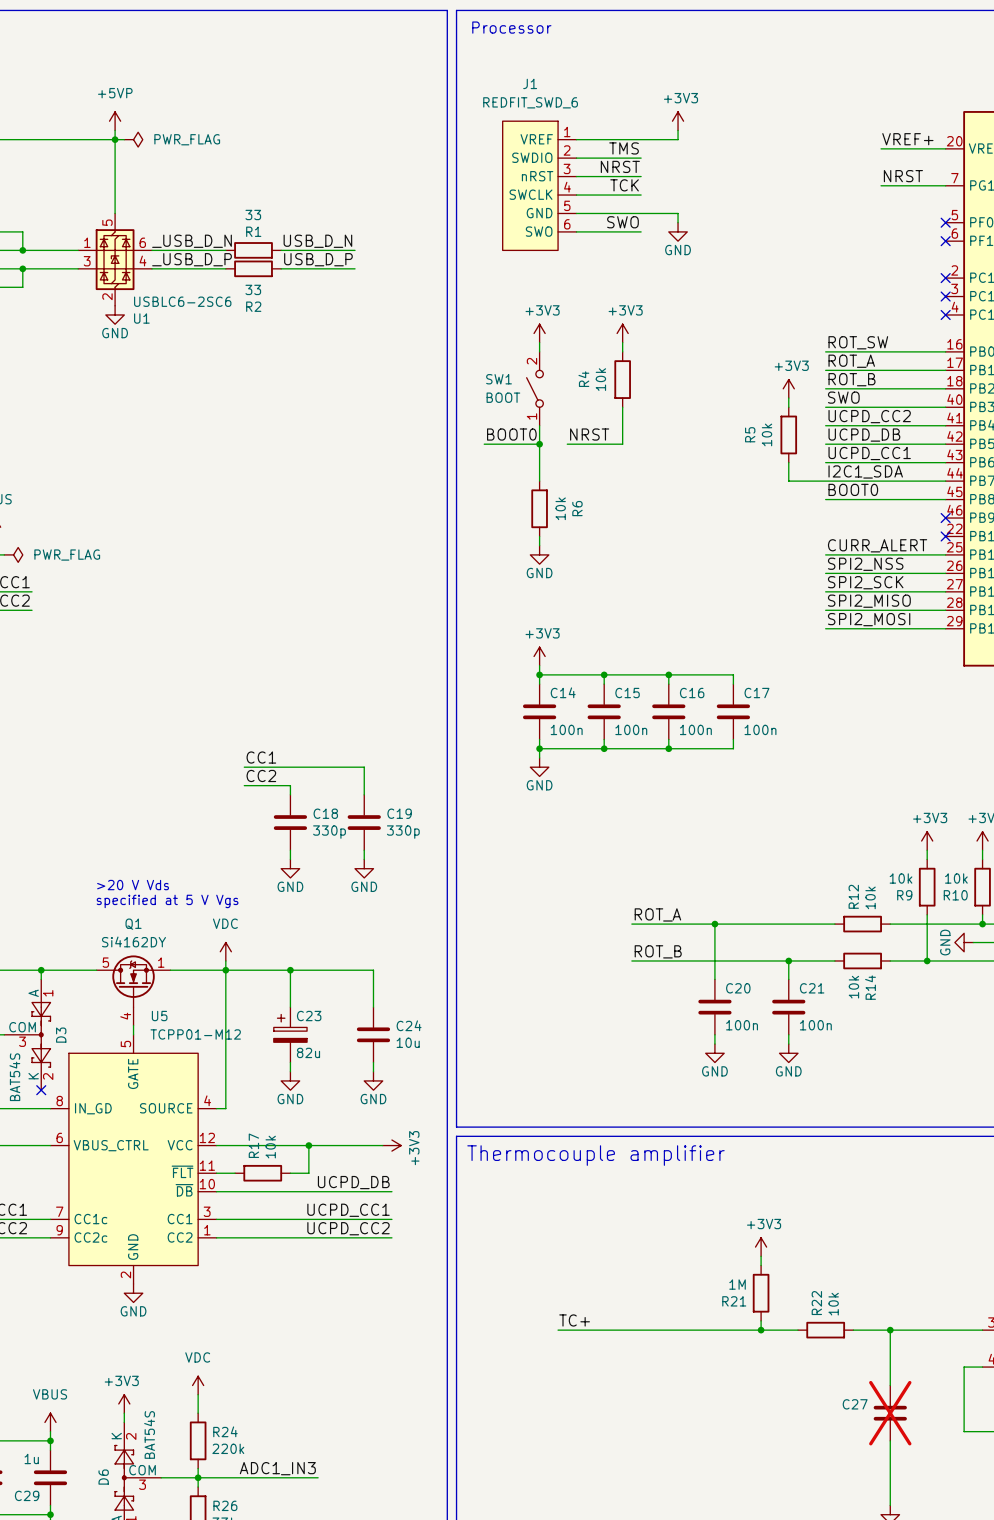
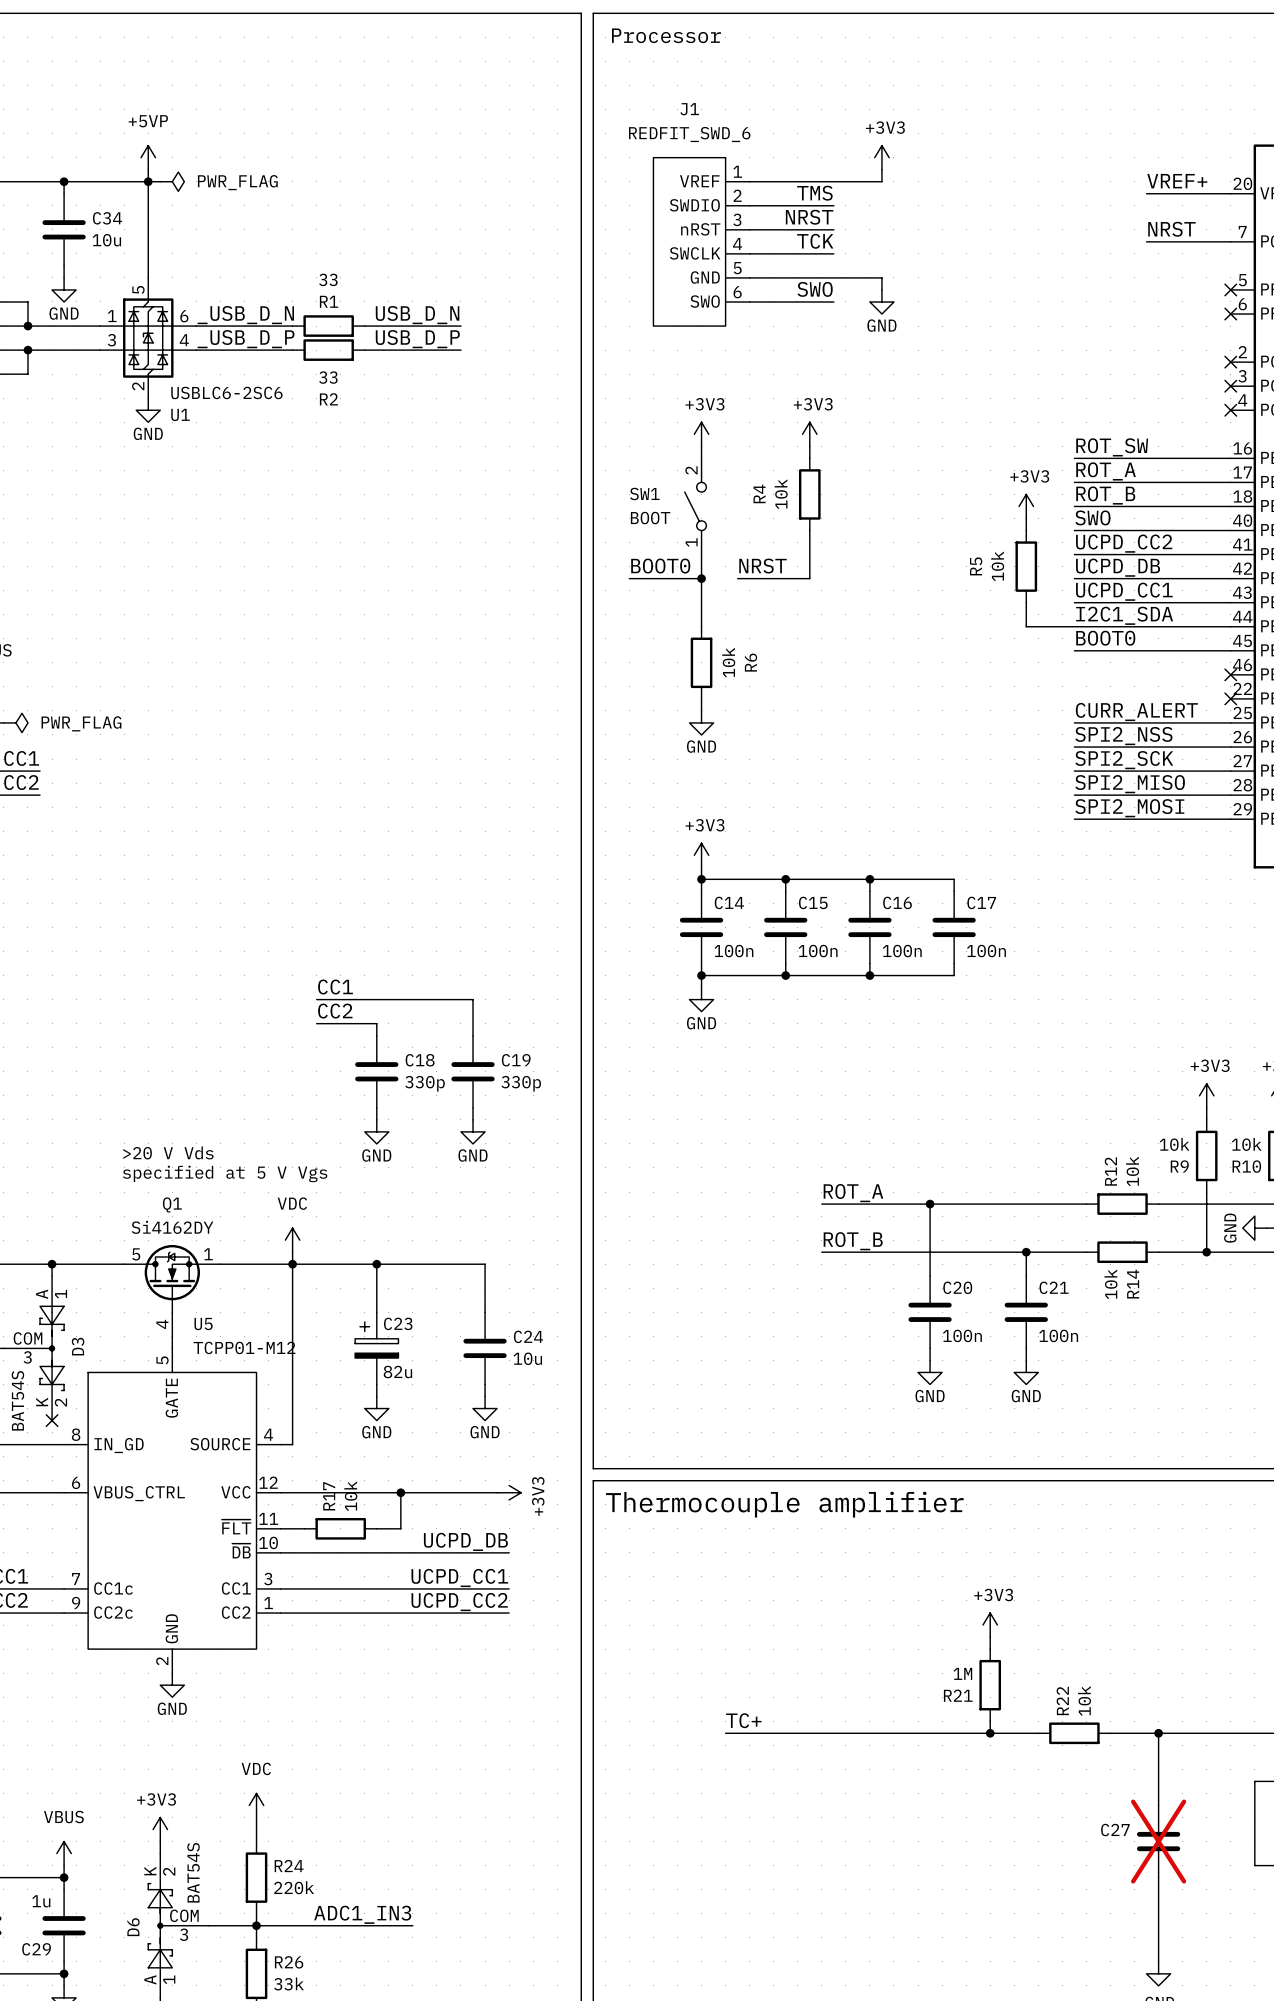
wire: none -> (64, 181) (64, 193)
junction: none -> (64, 181)
C34: none -> 10u (64, 229)
wire: none -> (64, 265) (64, 277)
power symbol: none -> GND (64, 289)

